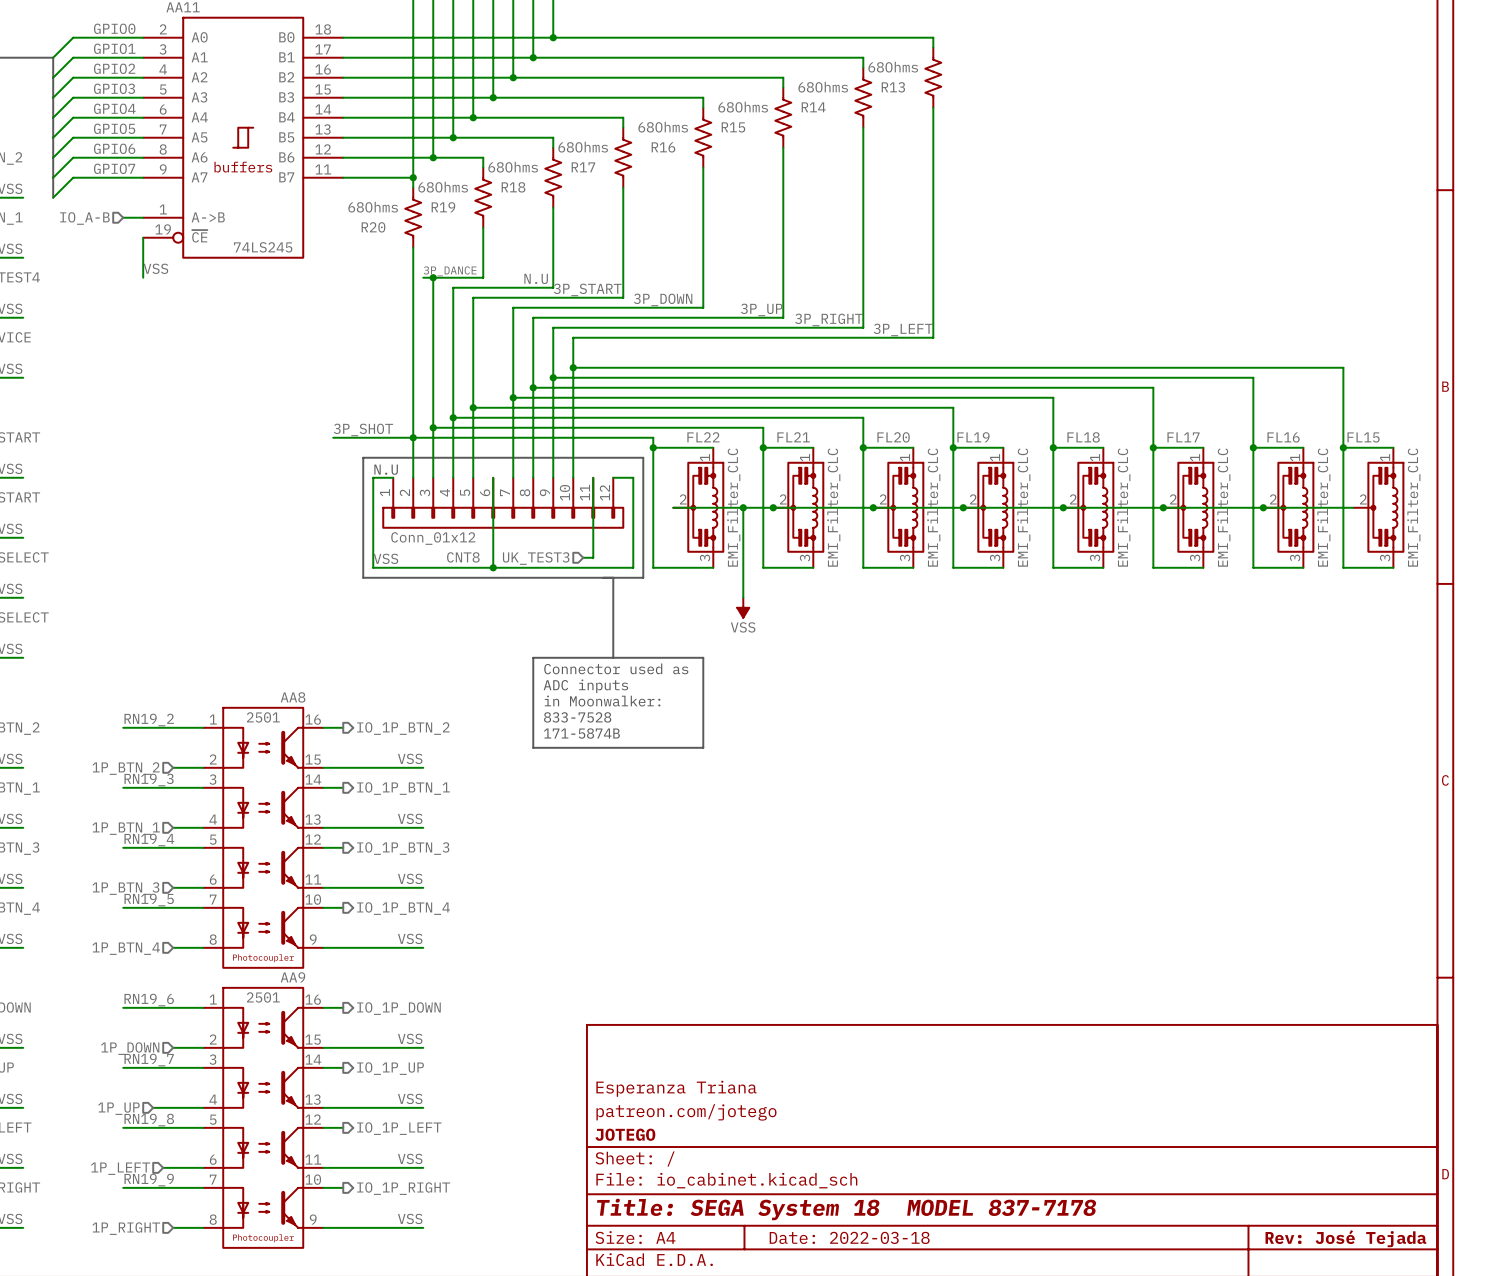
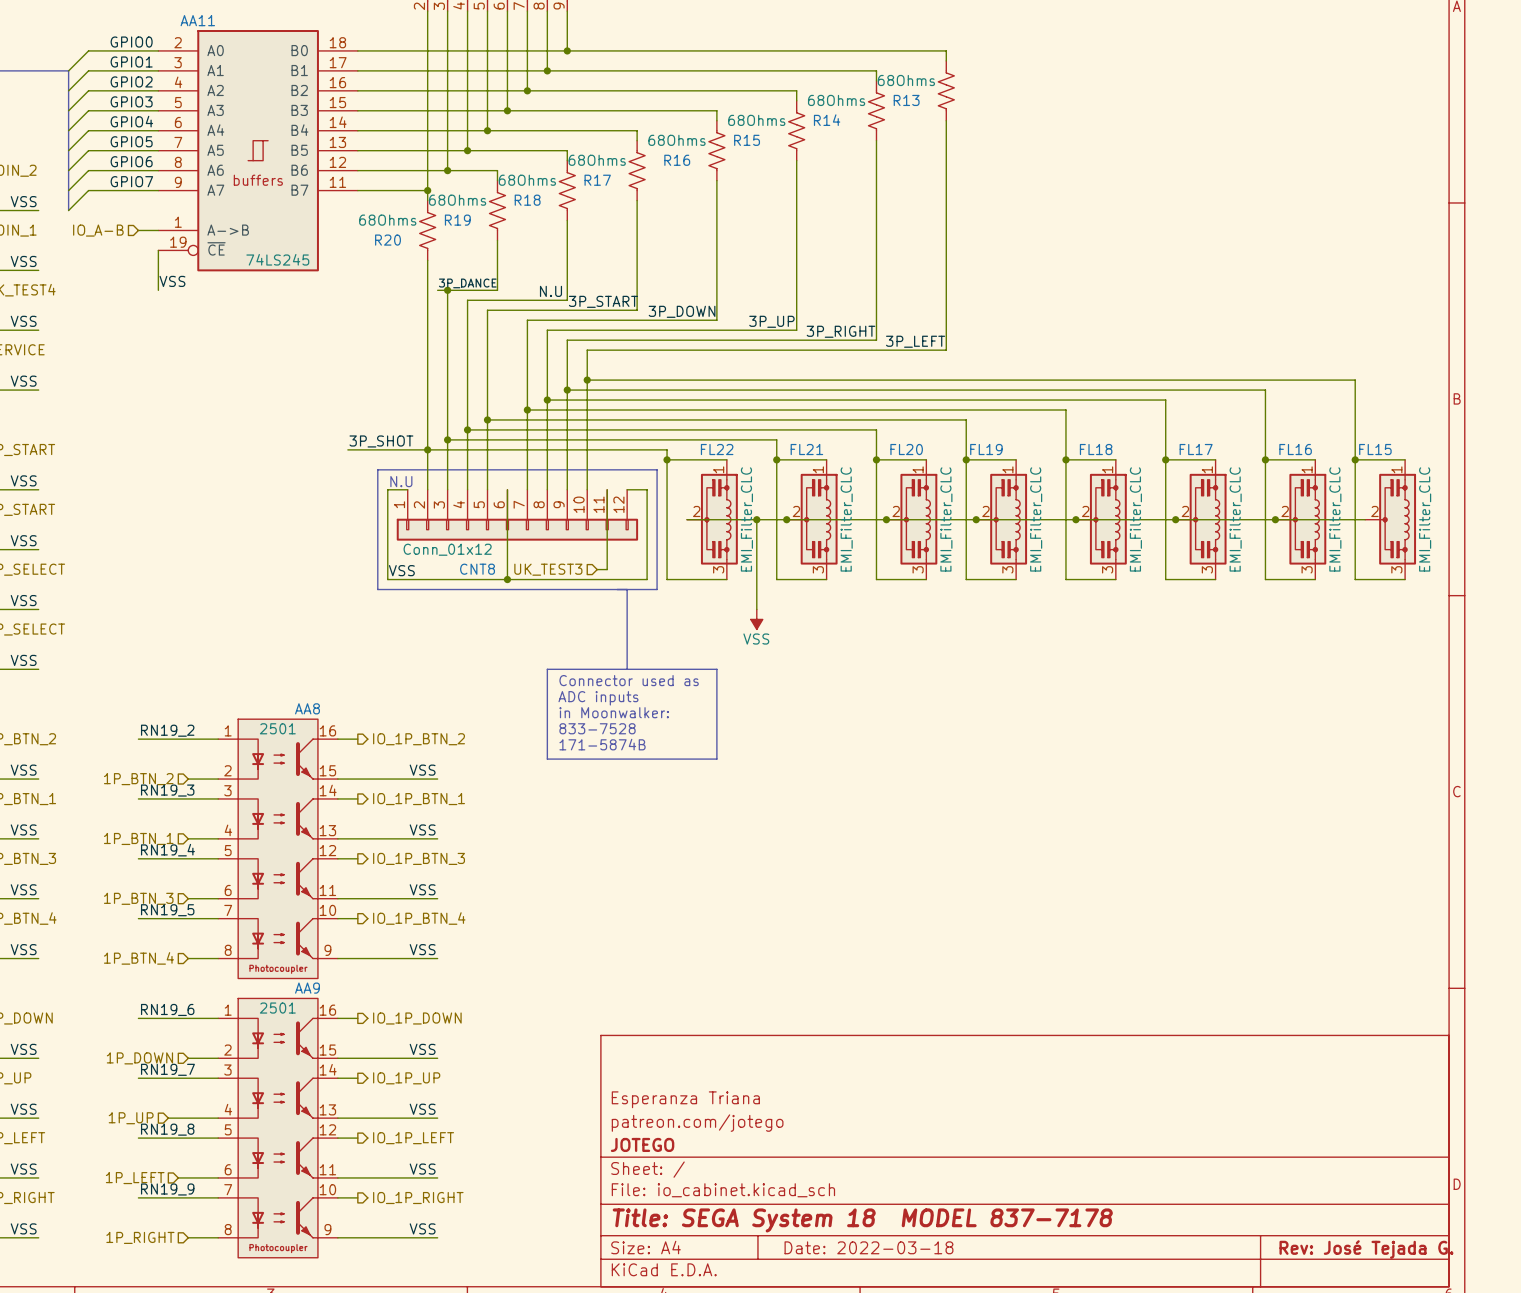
title block: Rev: José Tejada (1345, 1238) -> Rev: José Tejada G. (1366, 1249)

